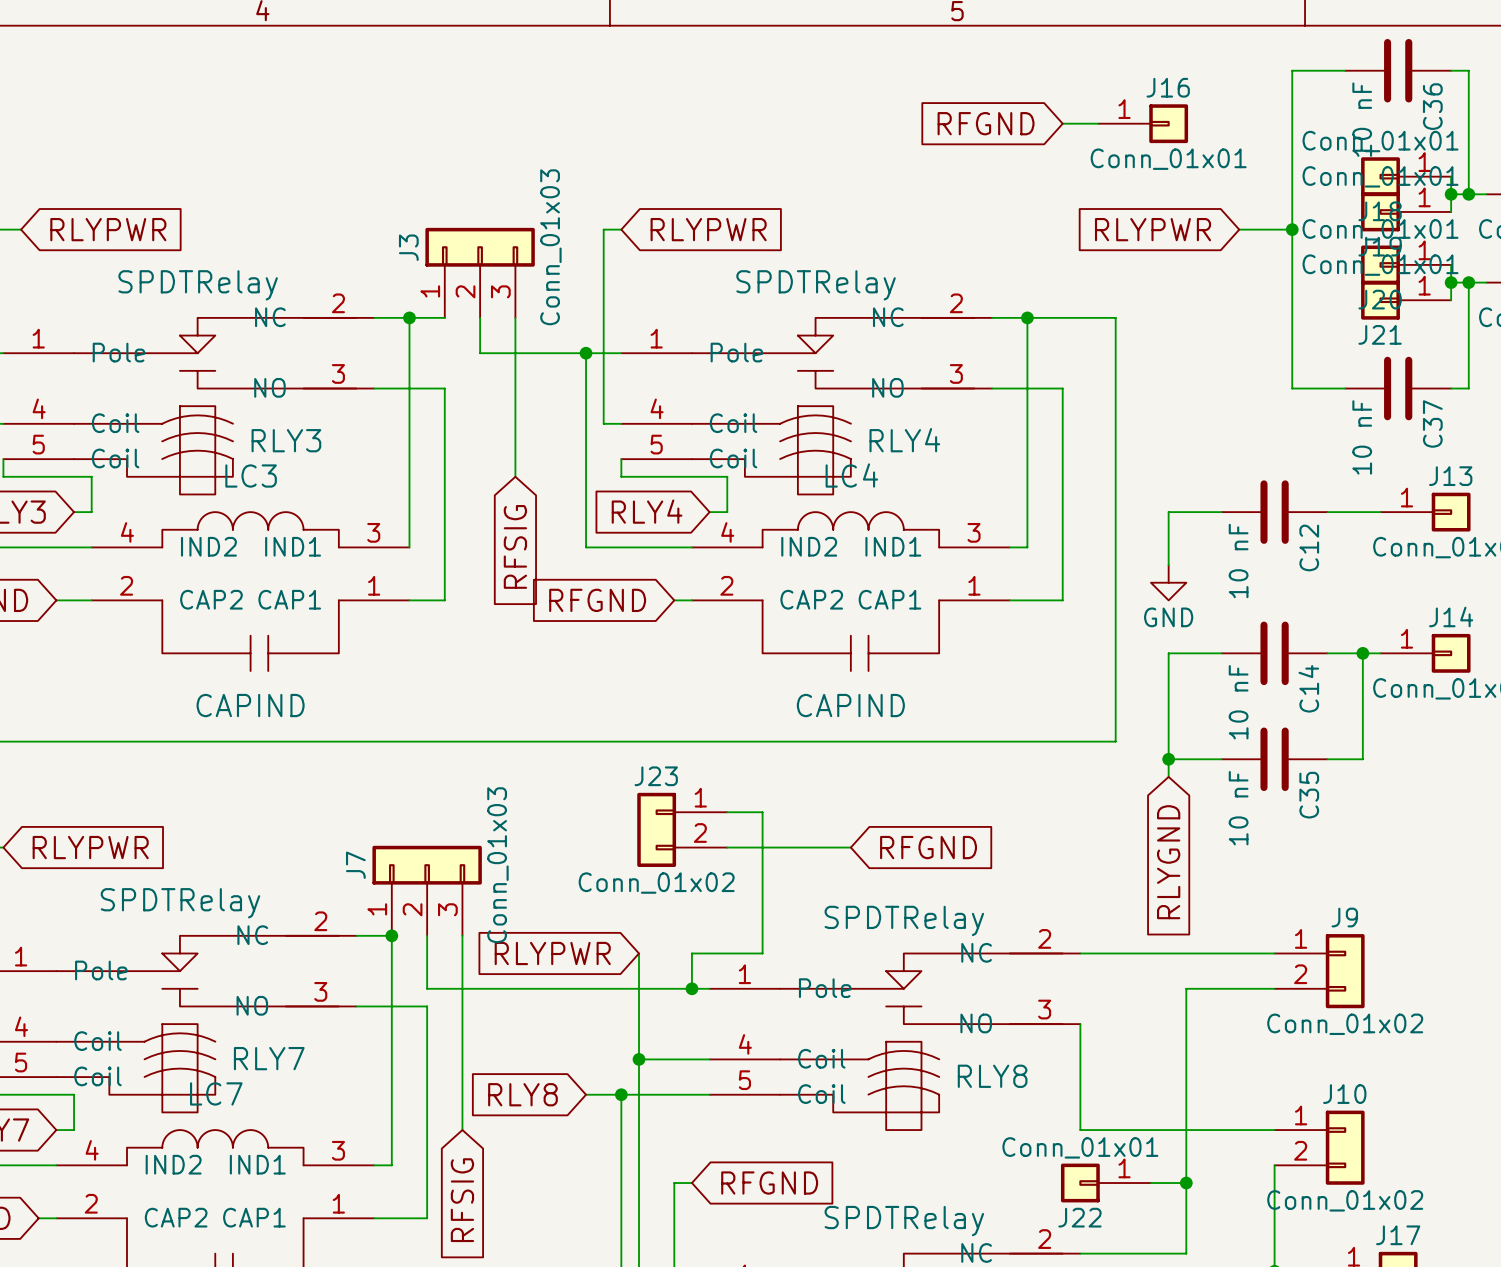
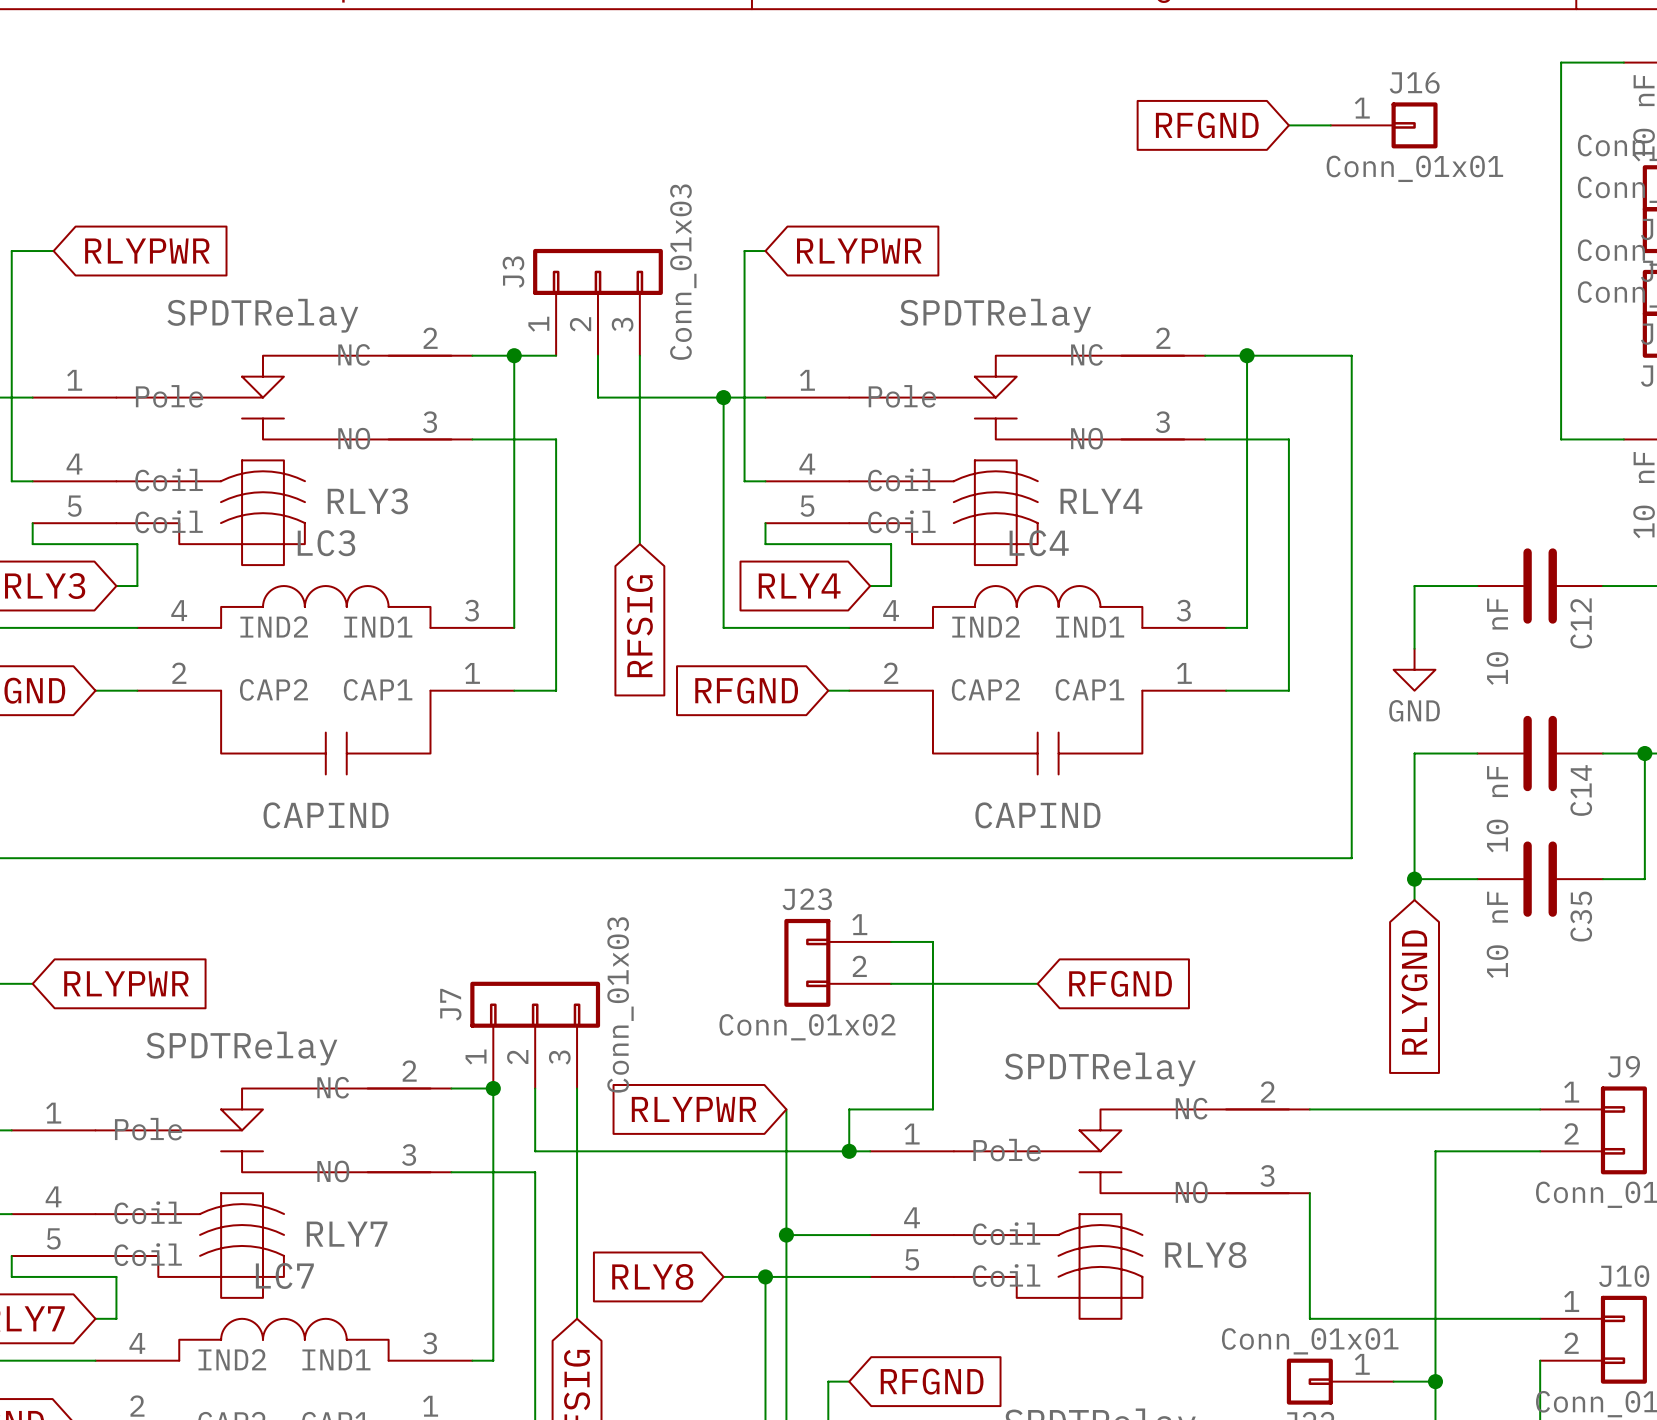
global label: RLYPWR (1153, 229) -> none
wire: (1239, 229) (1292, 229) -> none
junction: (1292, 229) -> none

